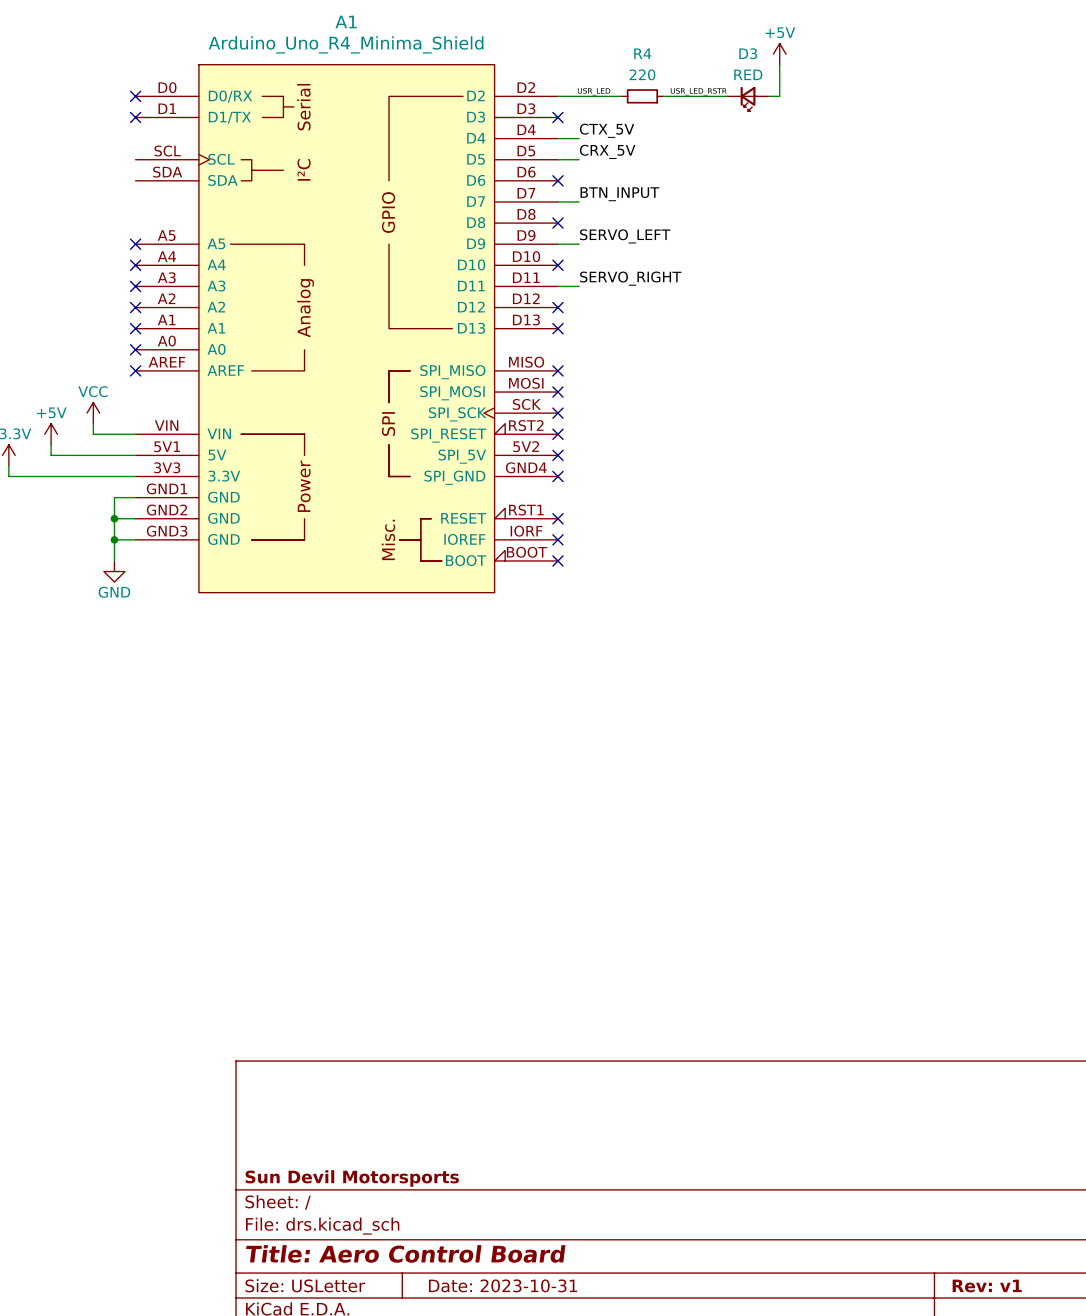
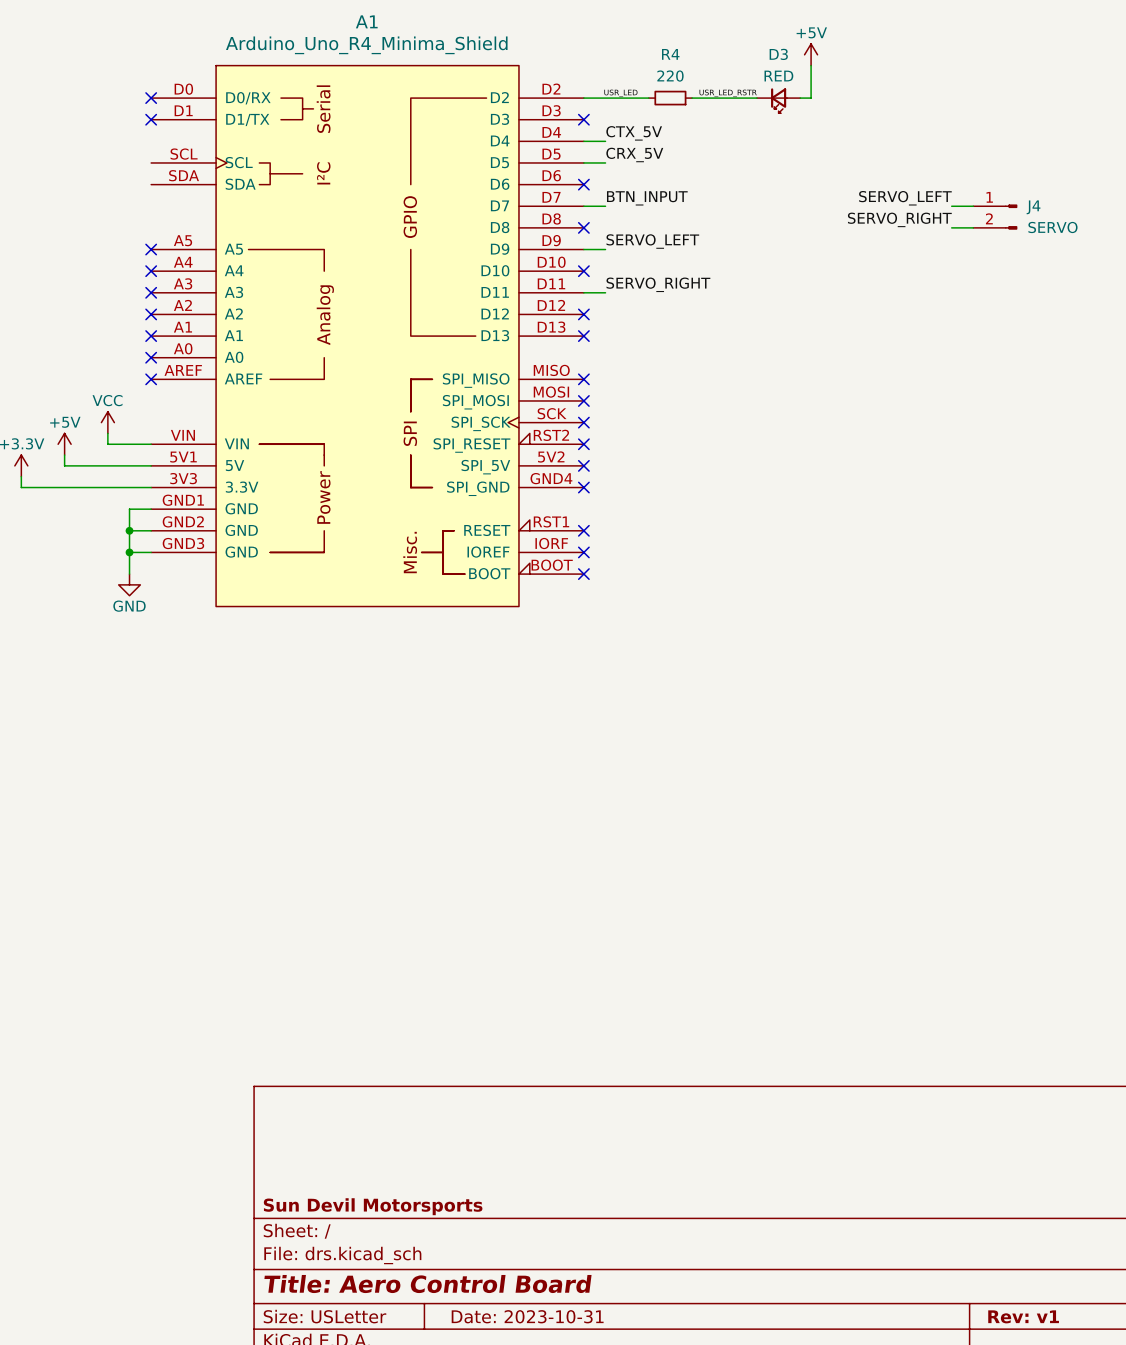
label: none -> SERVO_LEFT (905, 198)
wire: none -> (951, 206) (973, 206)
J4: none -> SERVO (995, 217)
label: none -> SERVO_RIGHT (899, 219)
wire: none -> (951, 227) (973, 227)

